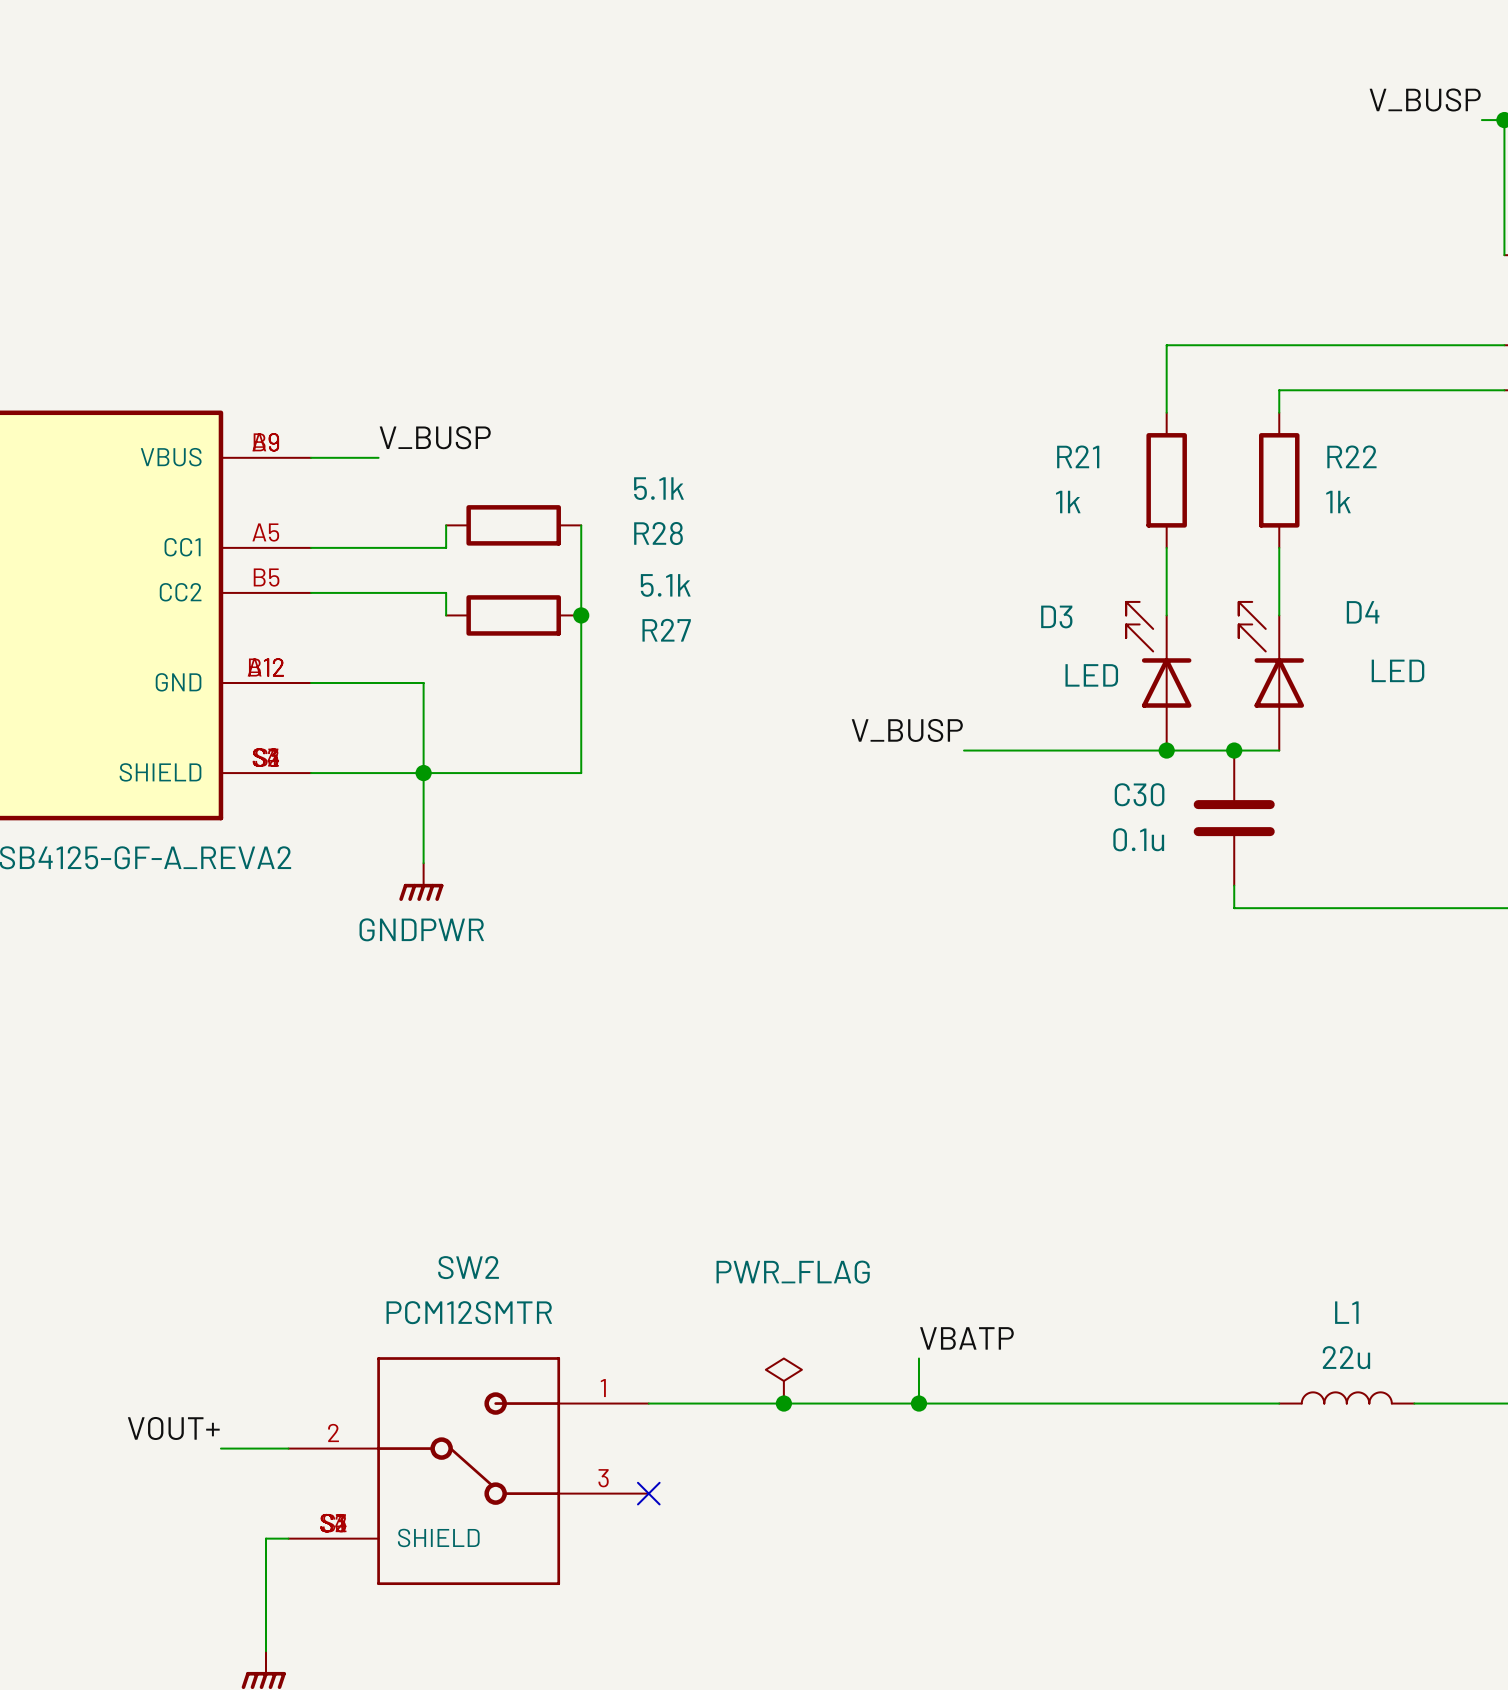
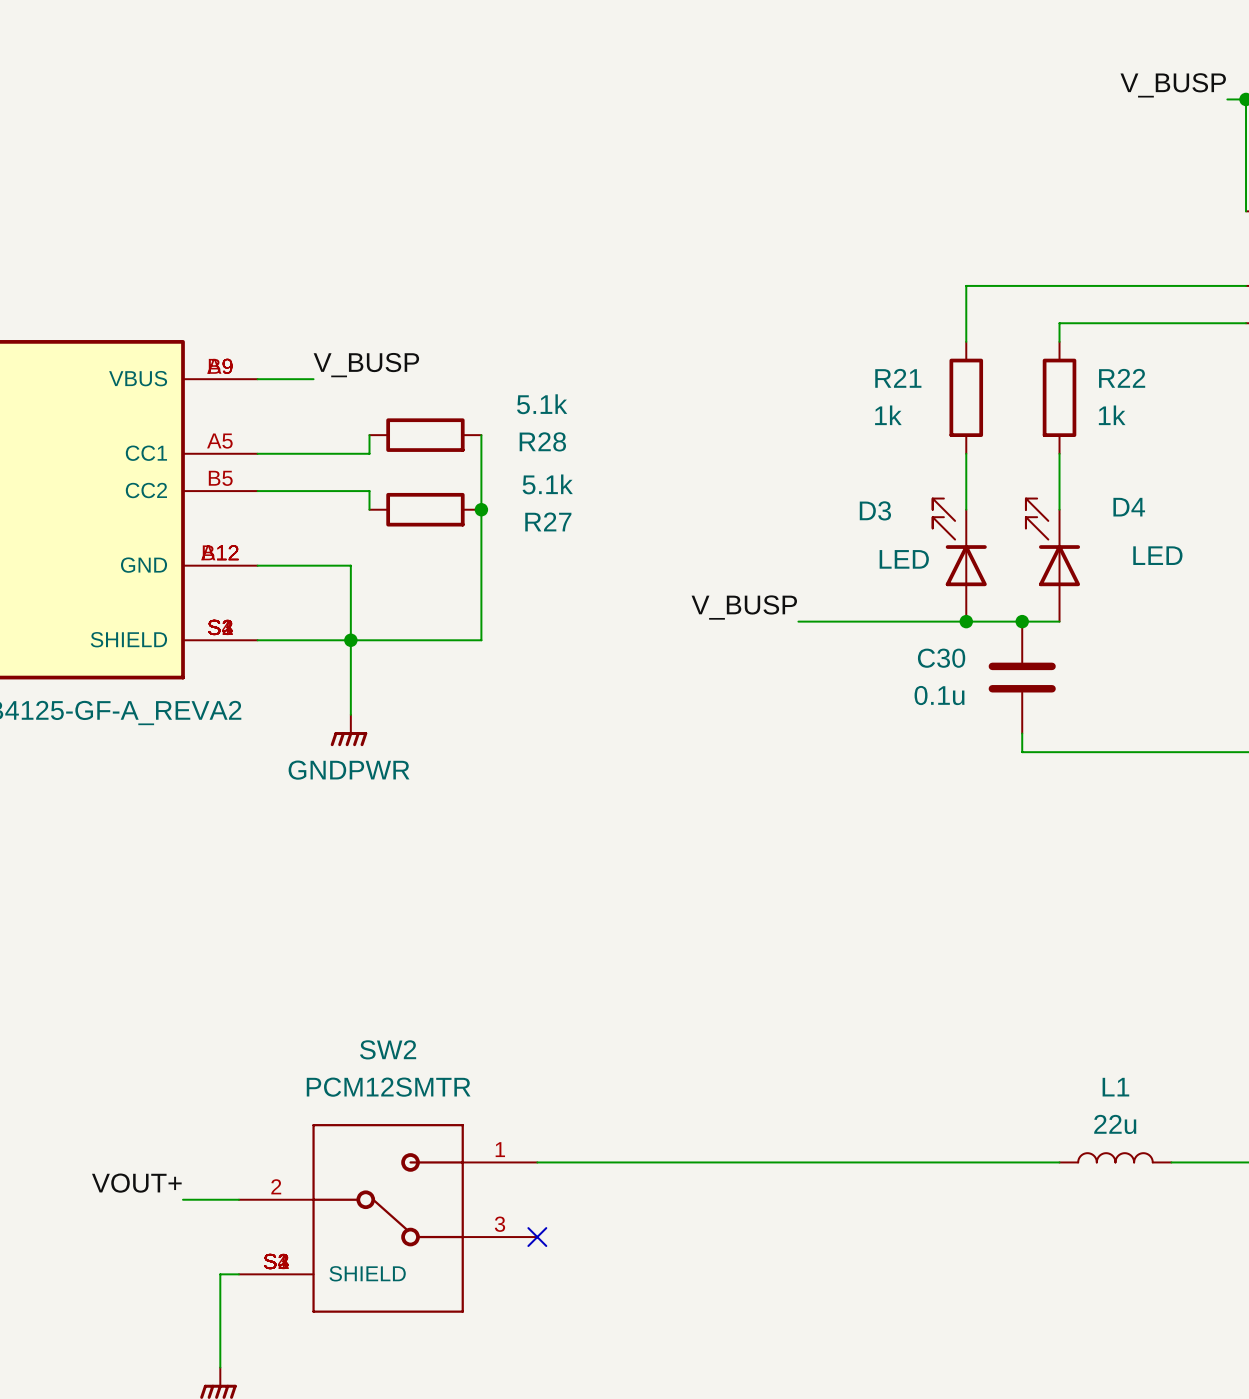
label: VBATP (966, 1338) -> none
wire: (918, 1358) (918, 1403) -> none
power symbol: PWR_FLAG (783, 1381) -> none
junction: (783, 1403) -> none
junction: (918, 1403) -> none

